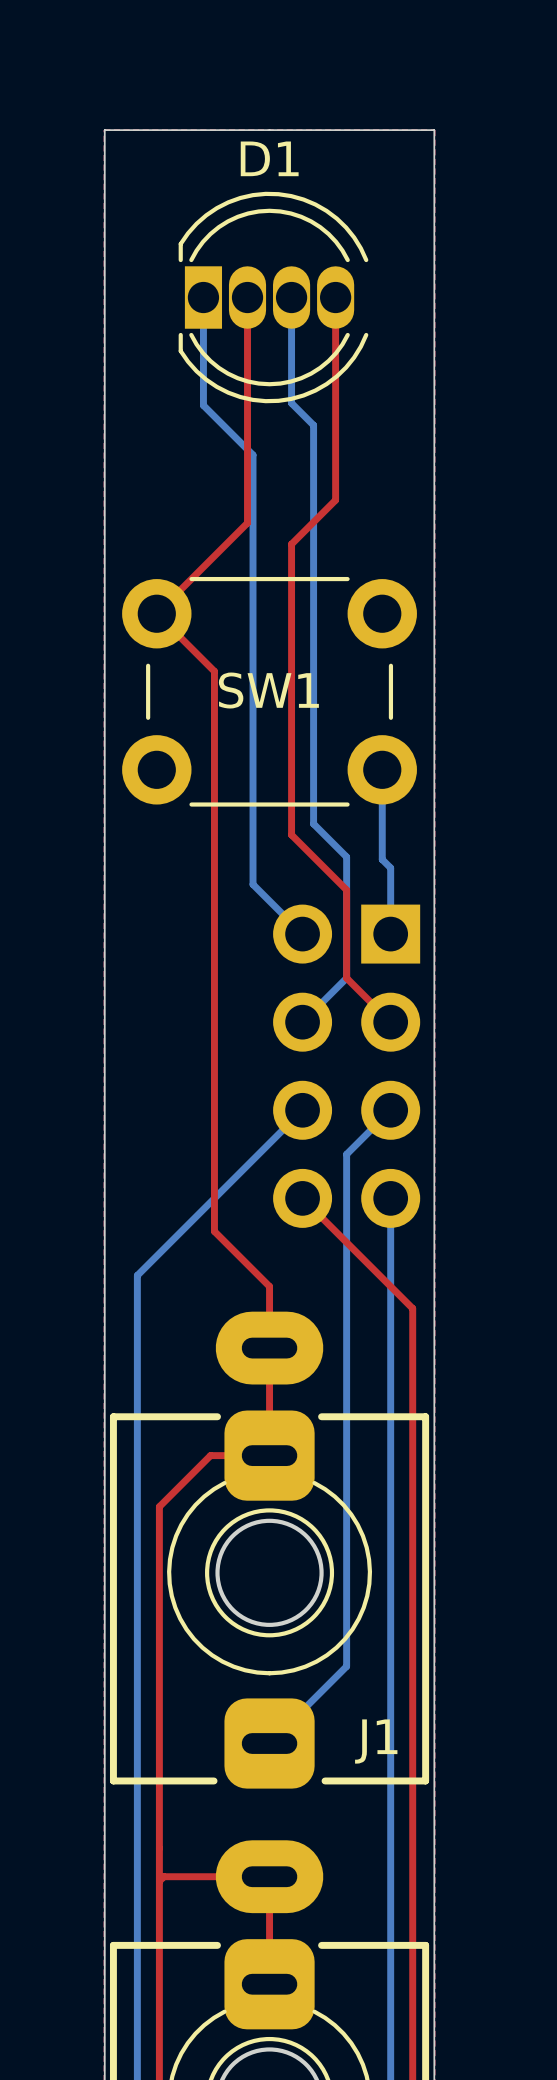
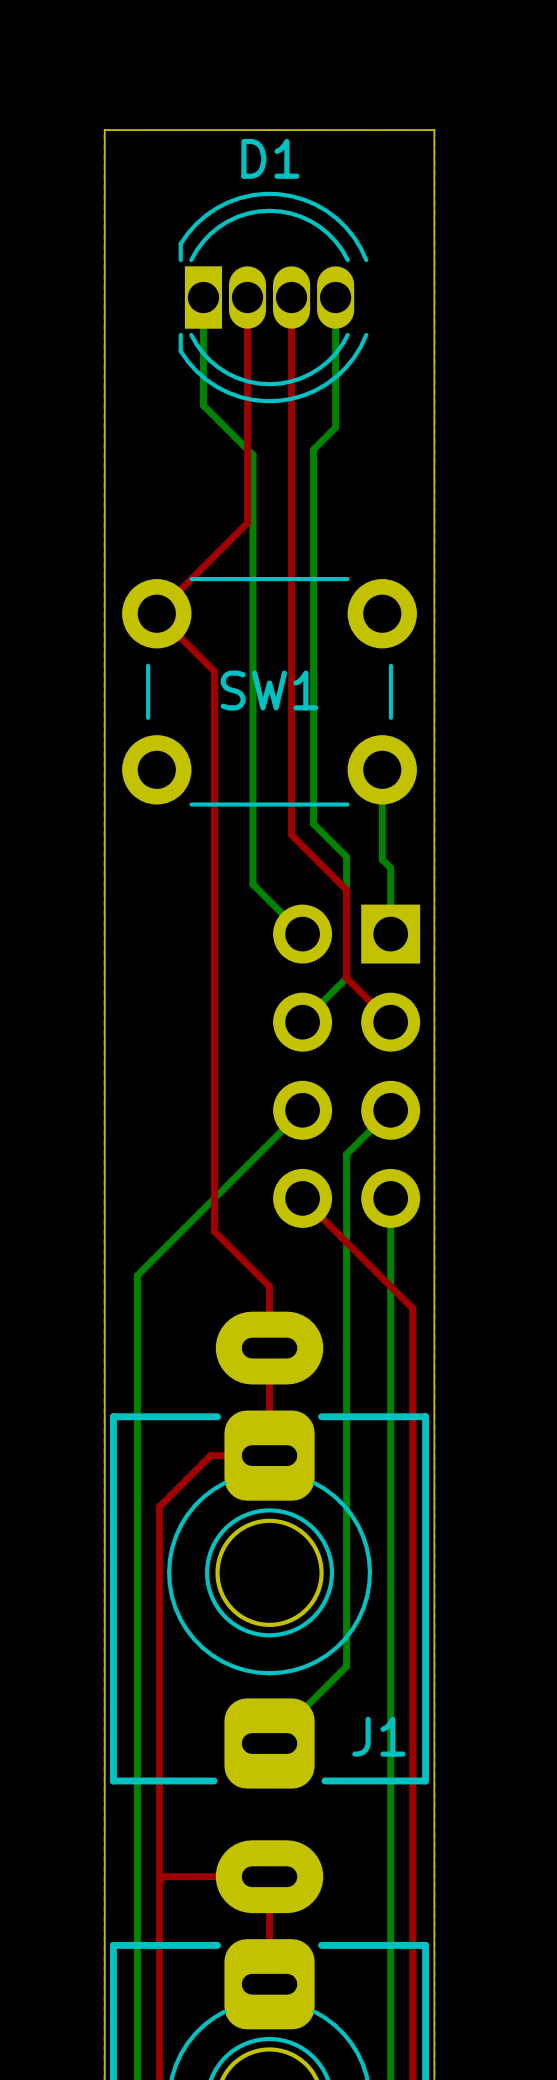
bottom track: (291, 297) (291, 403) (313, 425) (313, 449) -> (335, 295) (335, 427) (313, 449)
top track: (335, 297) (335, 500) (291, 544) -> (291, 295) (291, 544)

